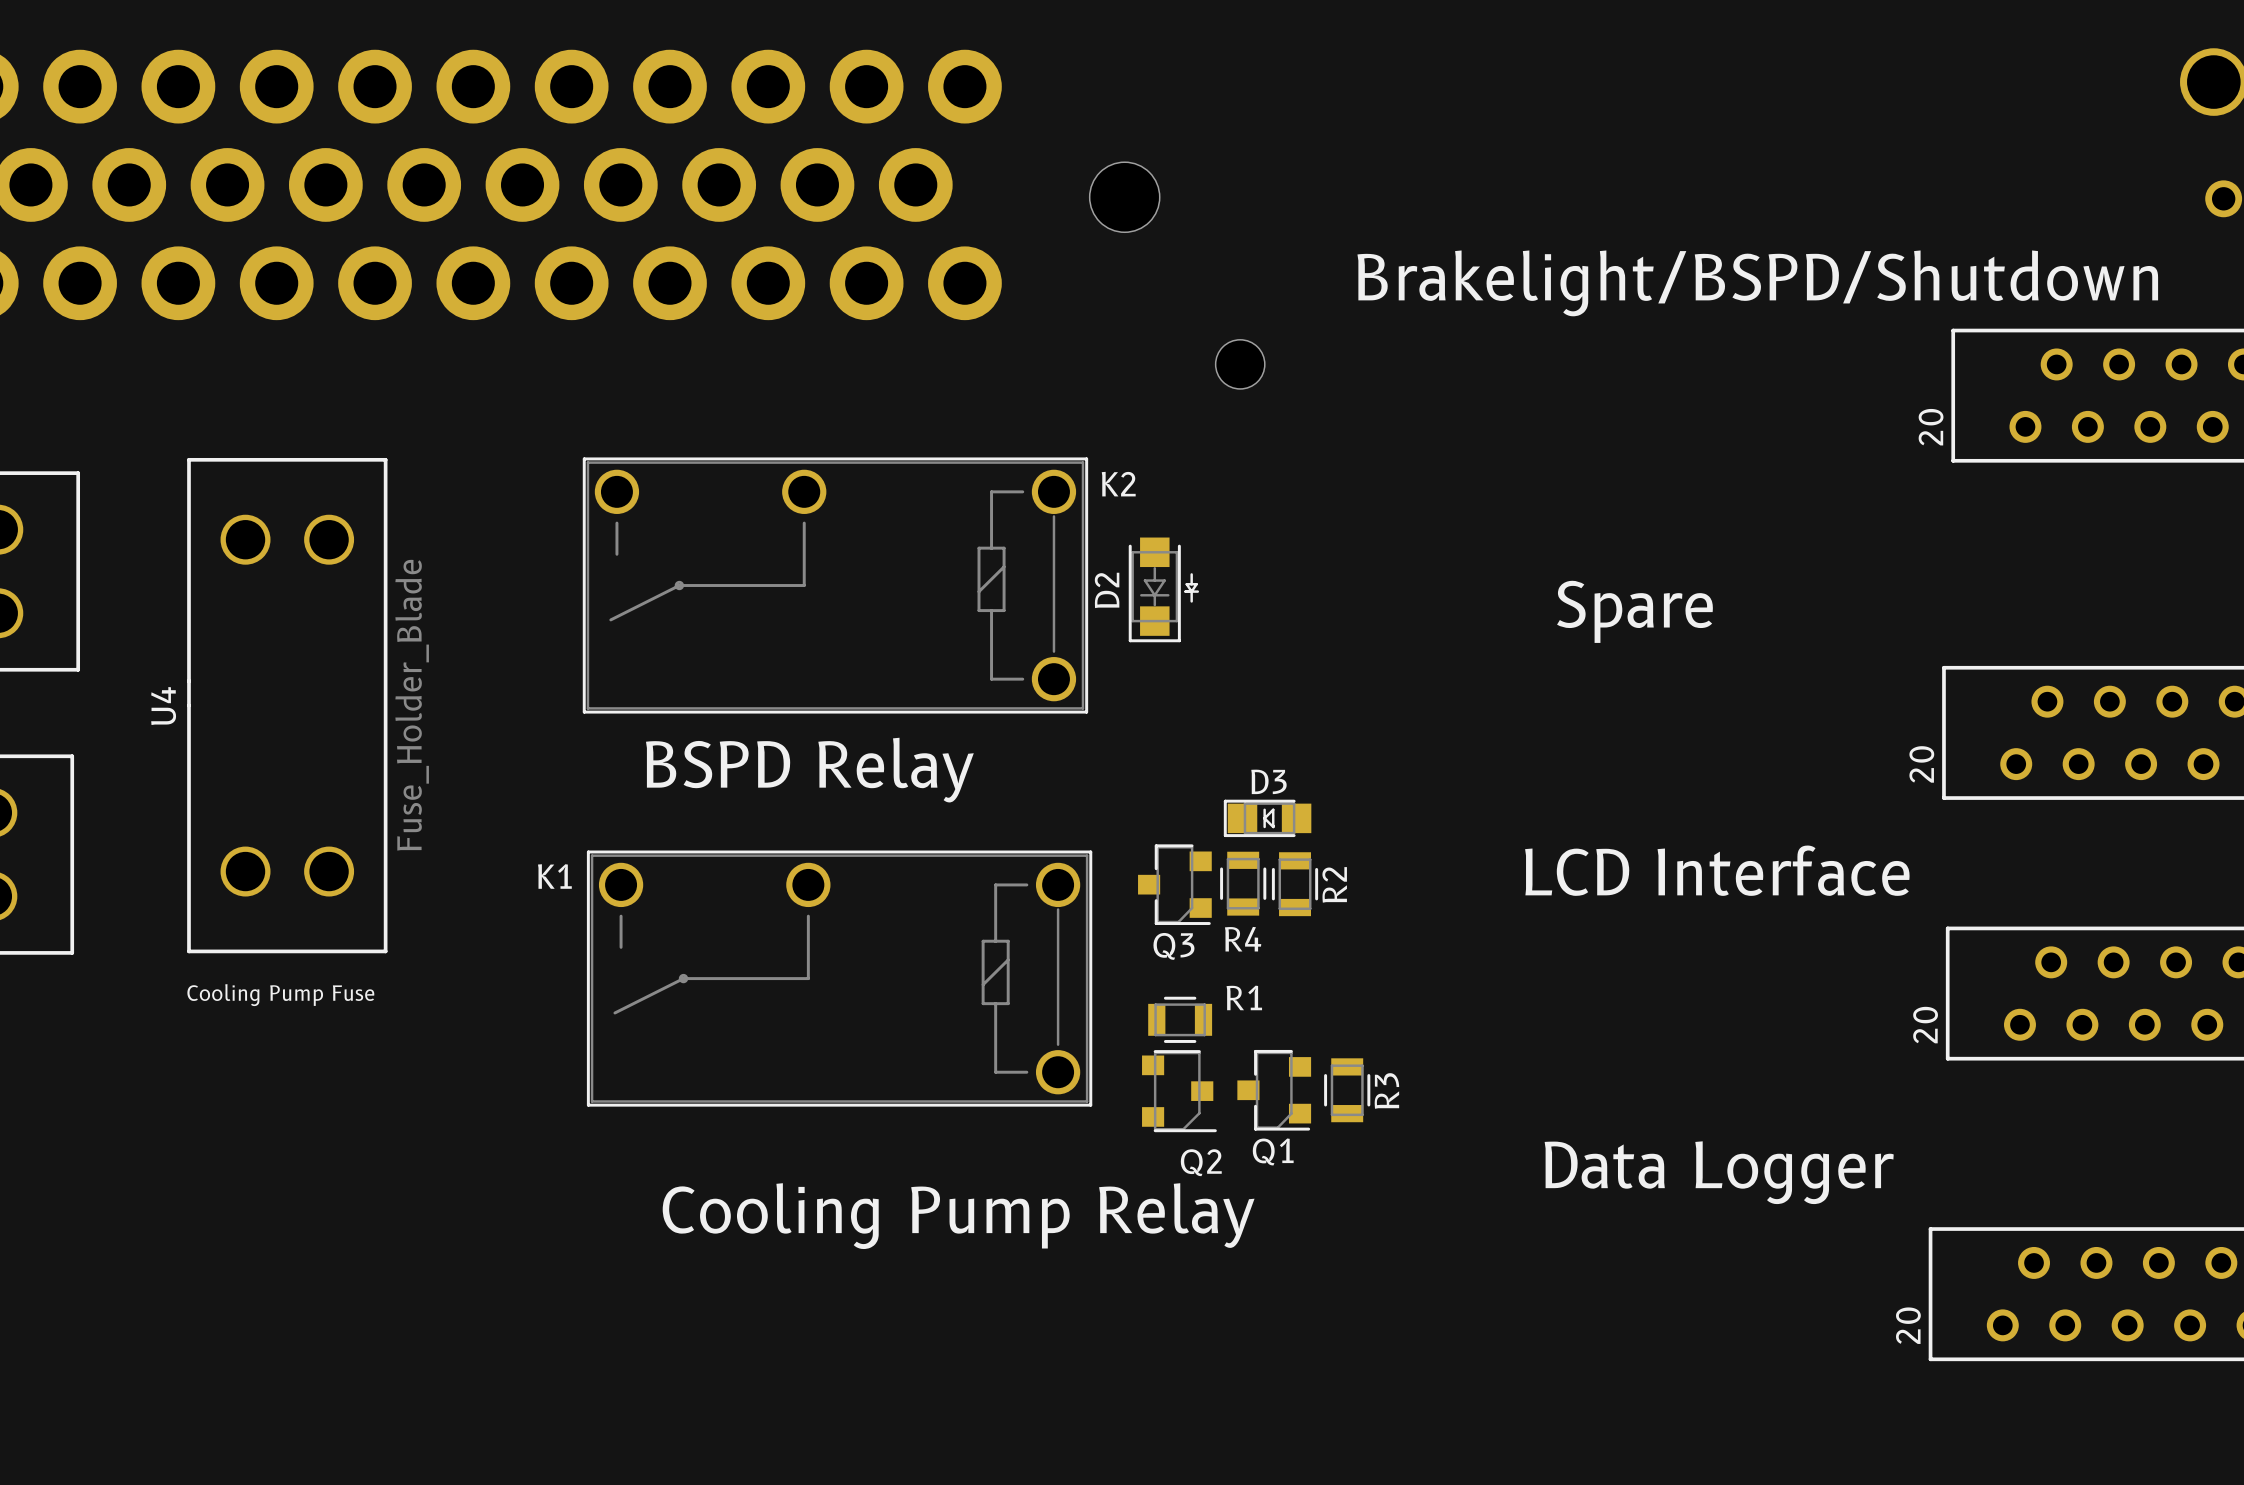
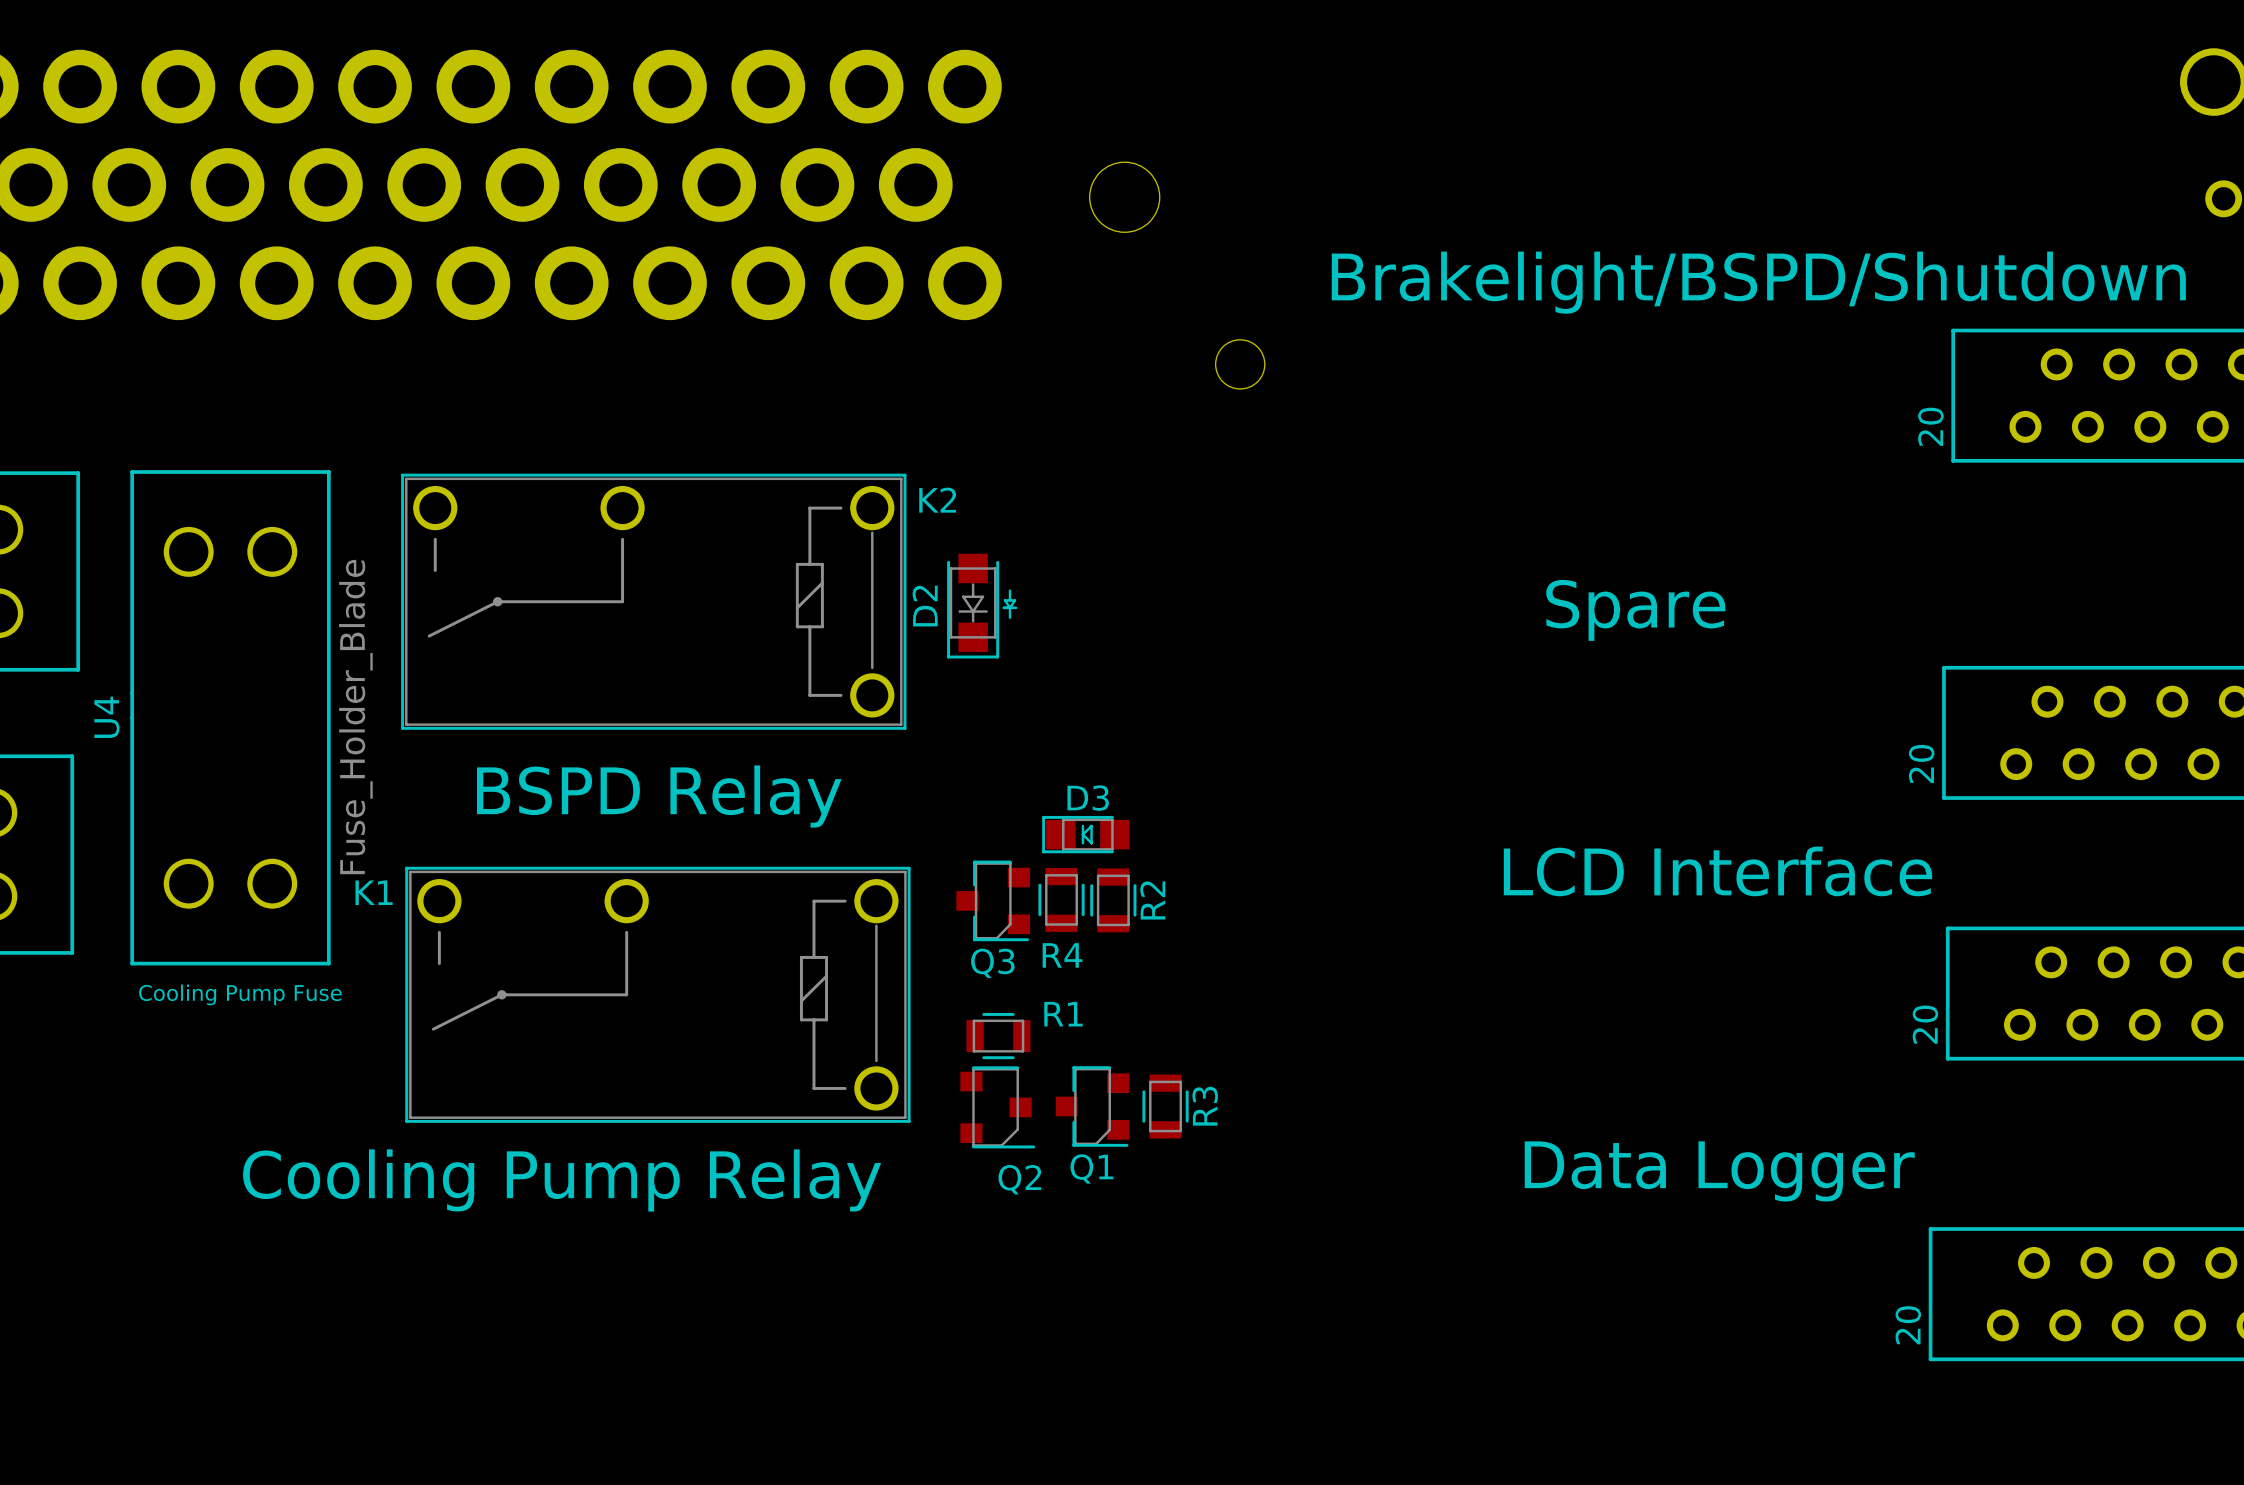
K2 position: (835, 585) -> (653, 601)
D2 position: (1163, 589) -> (982, 606)
U4 position: (287, 705) -> (230, 717)
text position: BSPD Relay (809, 770) -> BSPD Relay (659, 796)
D3 position: (1267, 818) -> (1085, 834)
R4 position: (1243, 883) -> (1061, 899)
Q3 position: (1174, 884) -> (993, 900)
R2 position: (1295, 884) -> (1113, 900)
K1 position: (839, 978) -> (657, 994)
text position: Cooling Pump Fuse (280, 995) -> Cooling Pump Fuse (240, 994)
R1 position: (1180, 1019) -> (998, 1036)
Q1 position: (1274, 1090) -> (1092, 1106)
R3 position: (1347, 1090) -> (1165, 1106)
Q2 position: (1179, 1091) -> (997, 1107)
text position: Cooling Pump Relay (958, 1216) -> Cooling Pump Relay (562, 1180)

